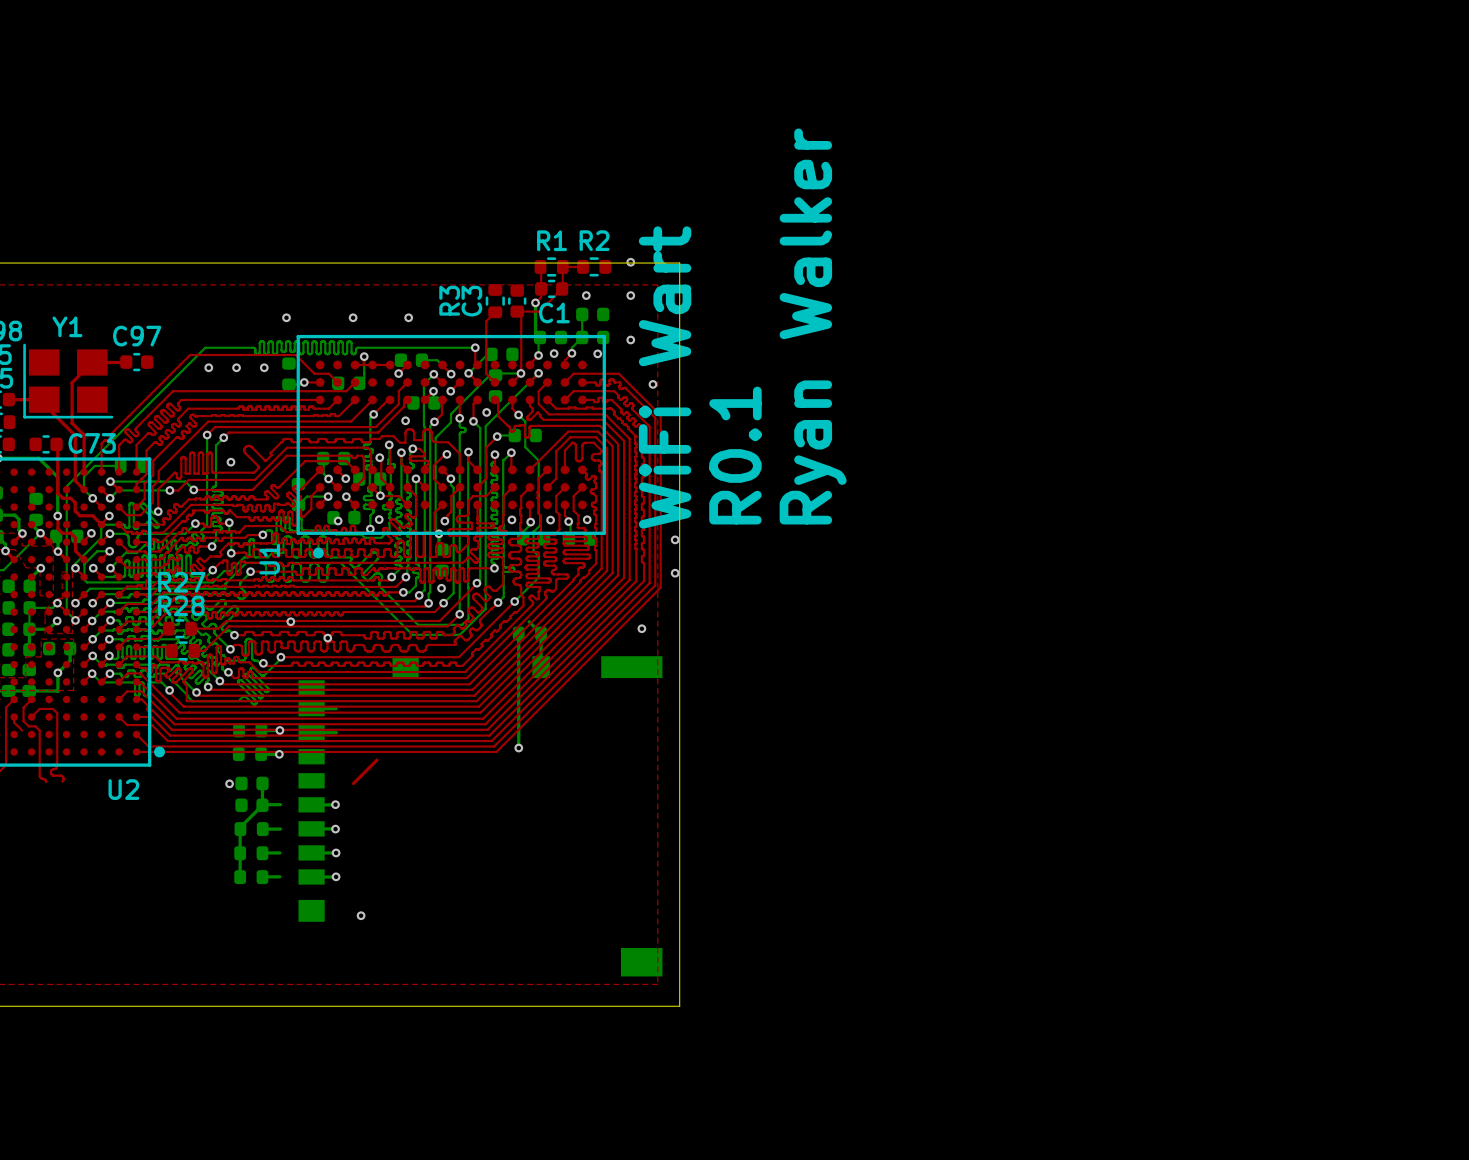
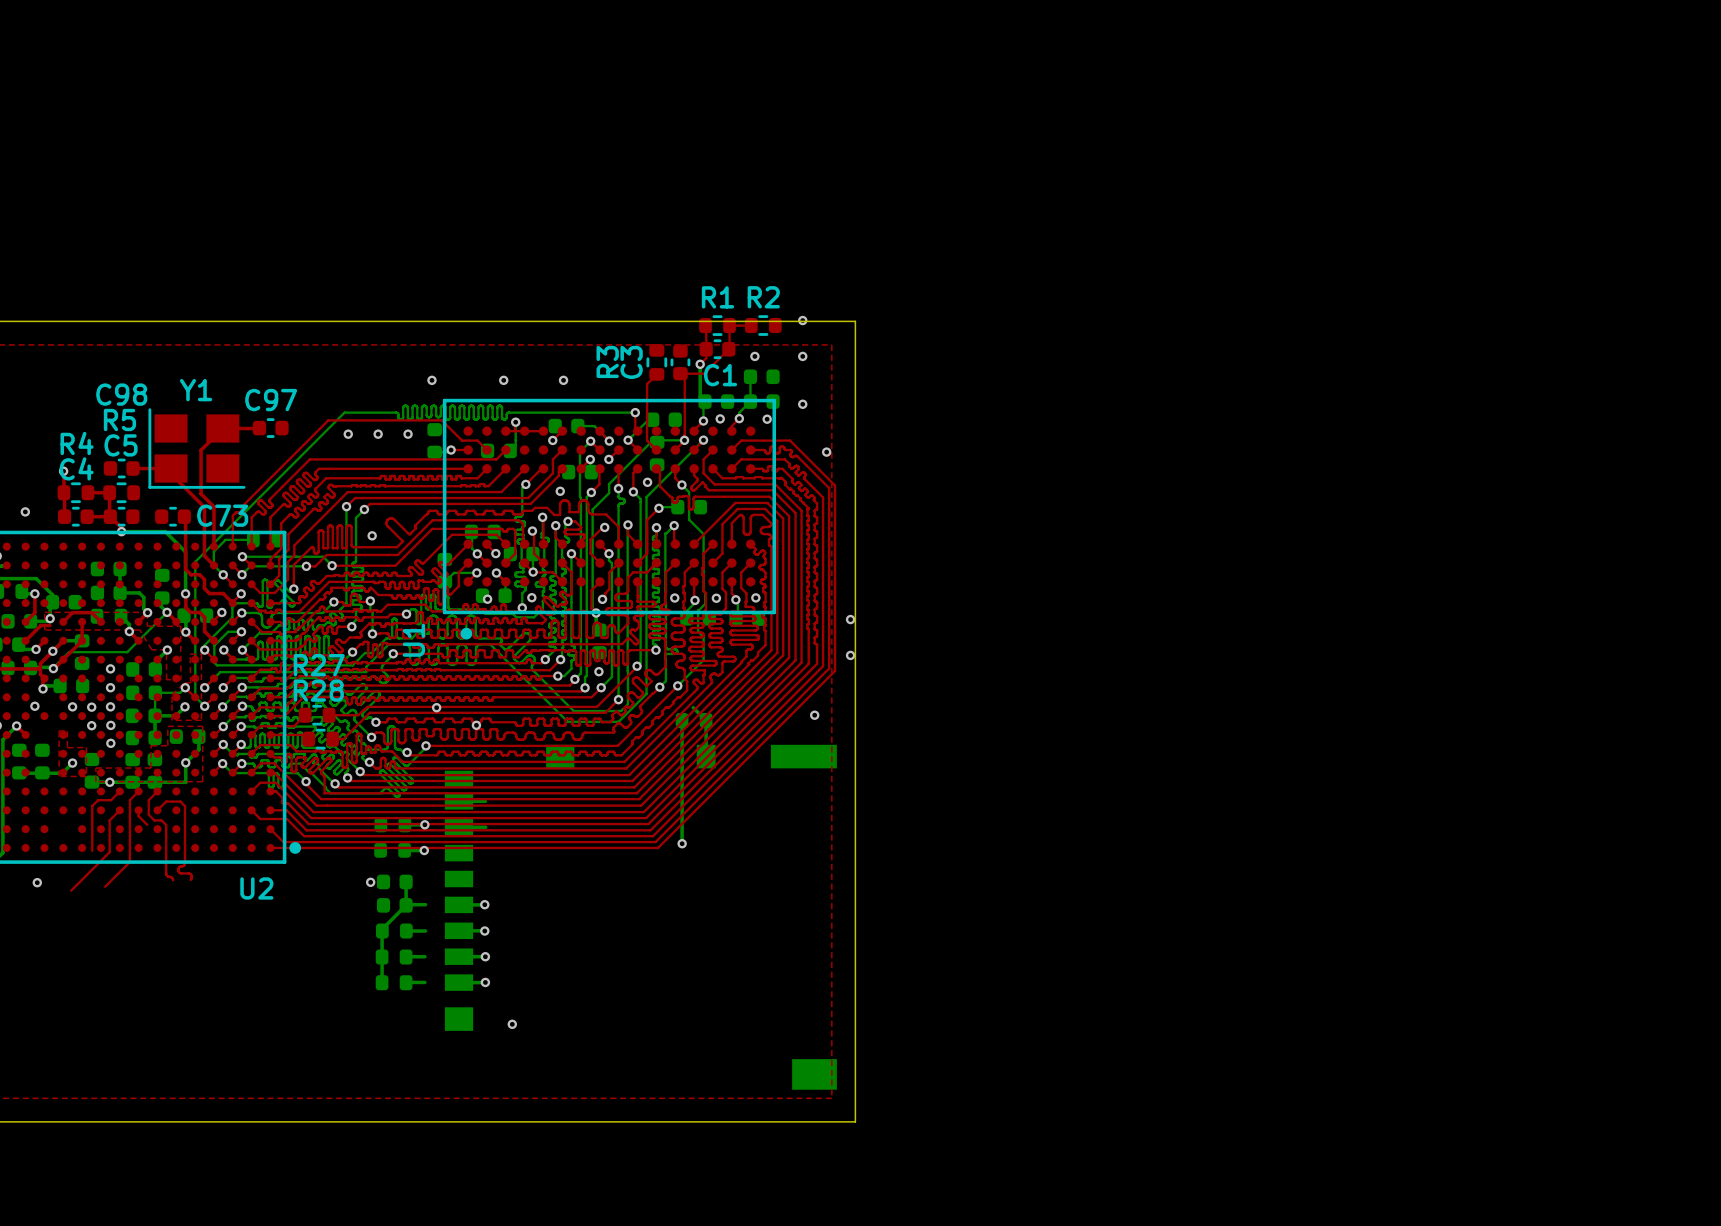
text: Ryan Walker (813, 326) -> none
text: WiFi Wart (665, 377) -> none
text: R0.1 (735, 455) -> none
top track: (376, 760) (353, 783) -> none

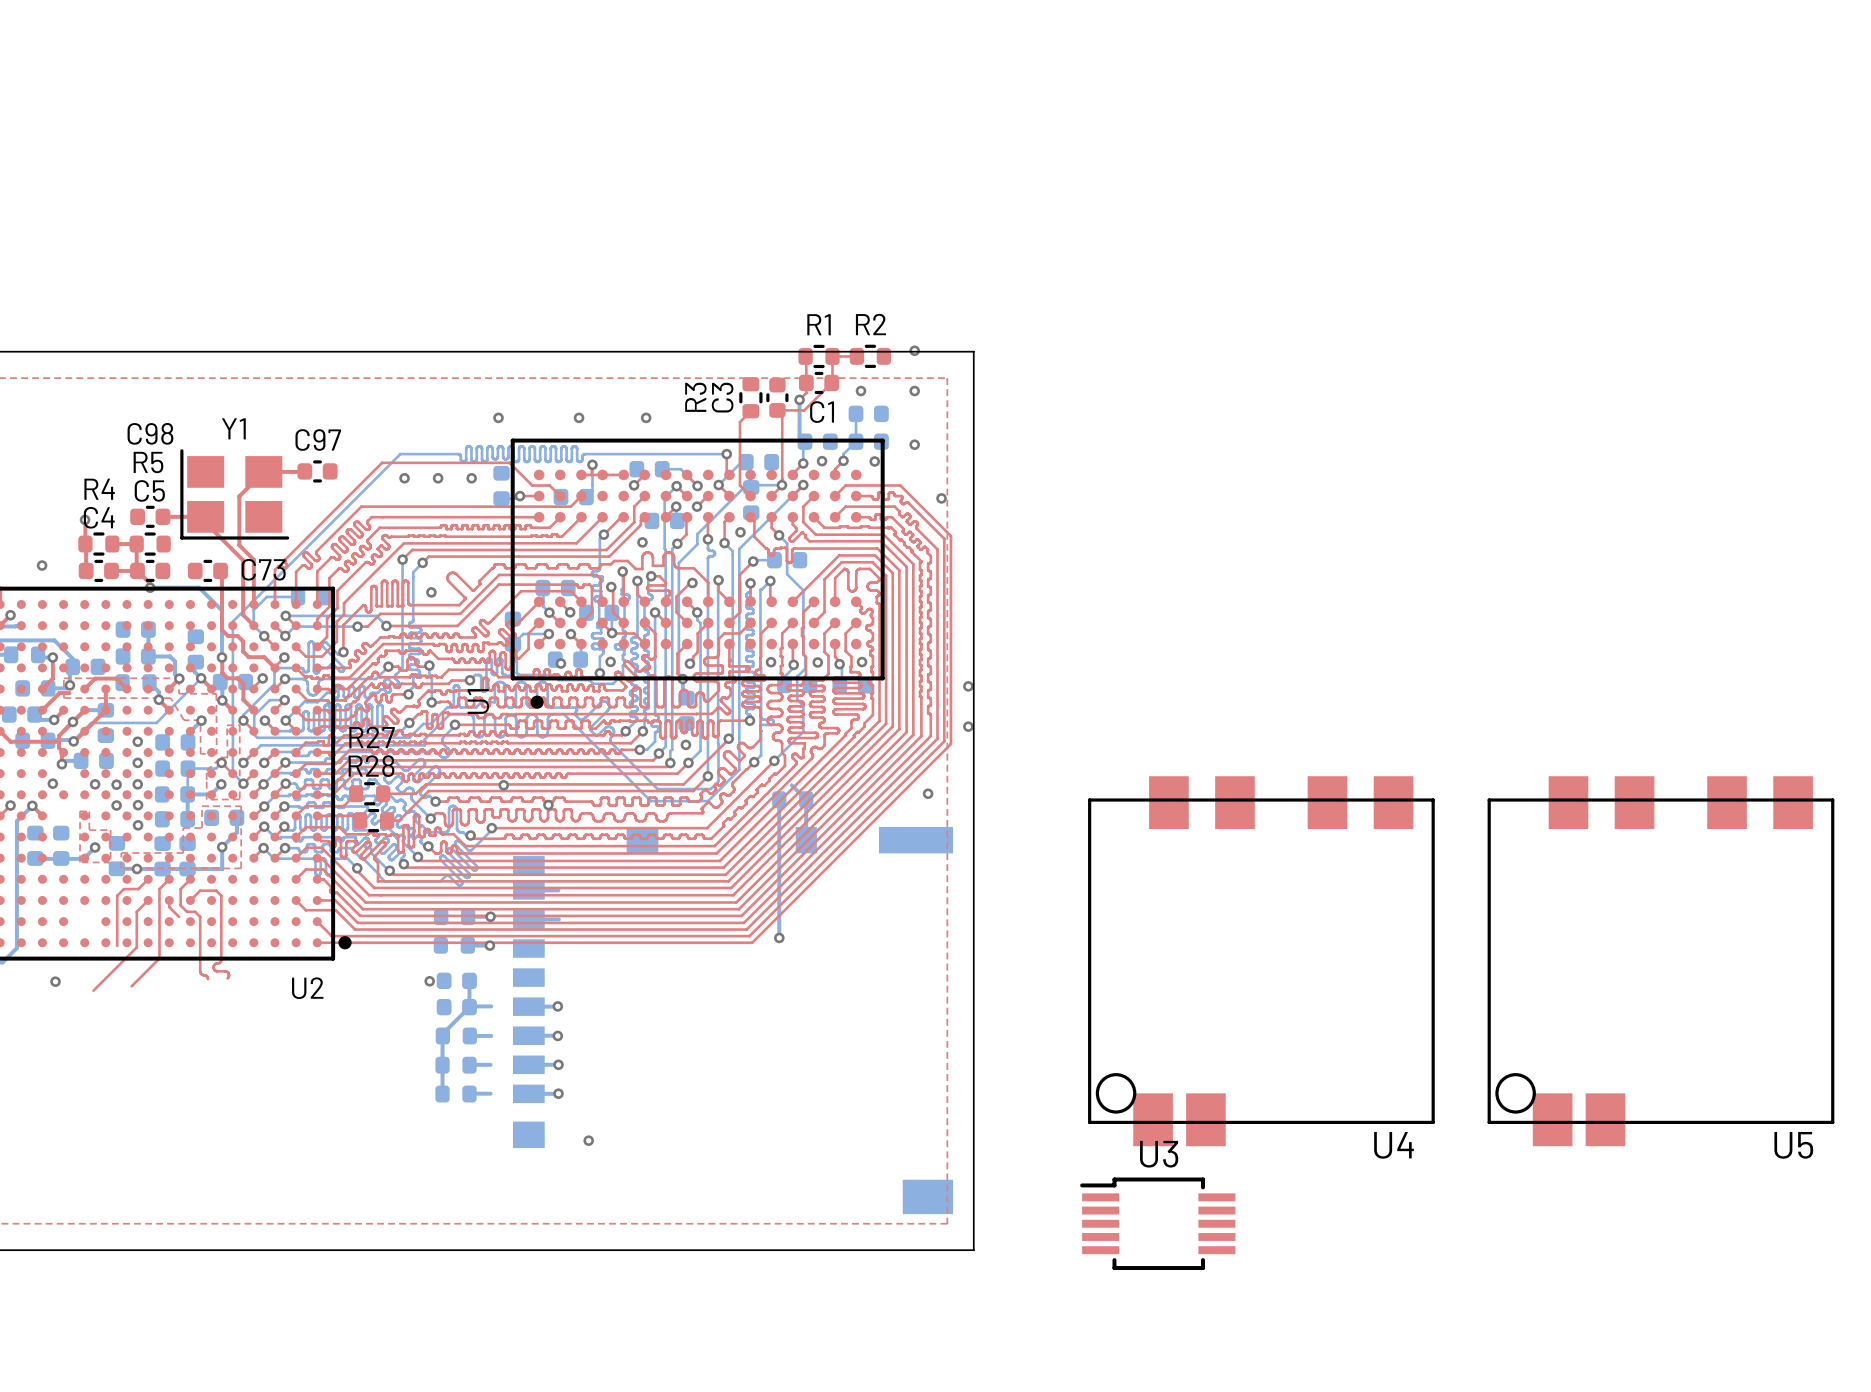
U4: none -> (1261, 961)
U5: none -> (1660, 961)
U3: none -> (1157, 1223)

